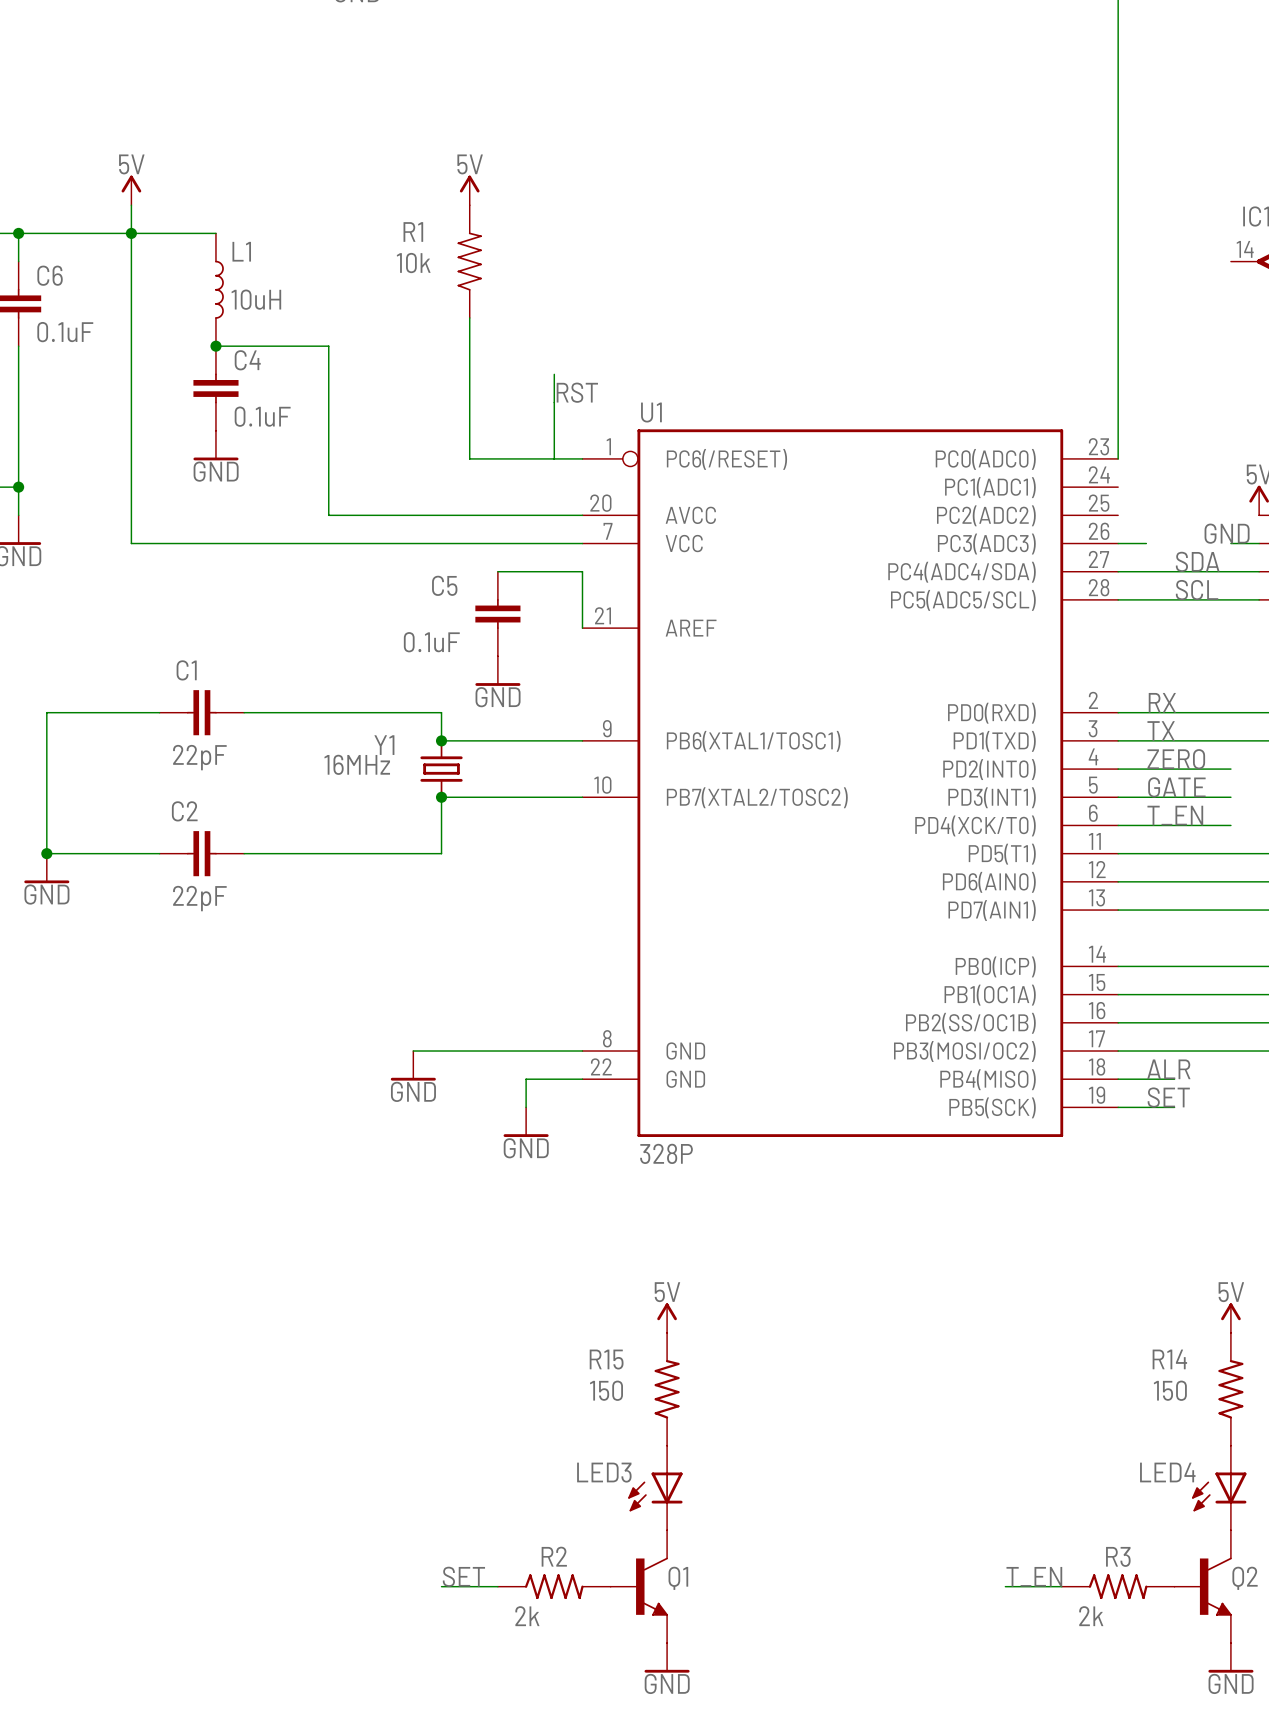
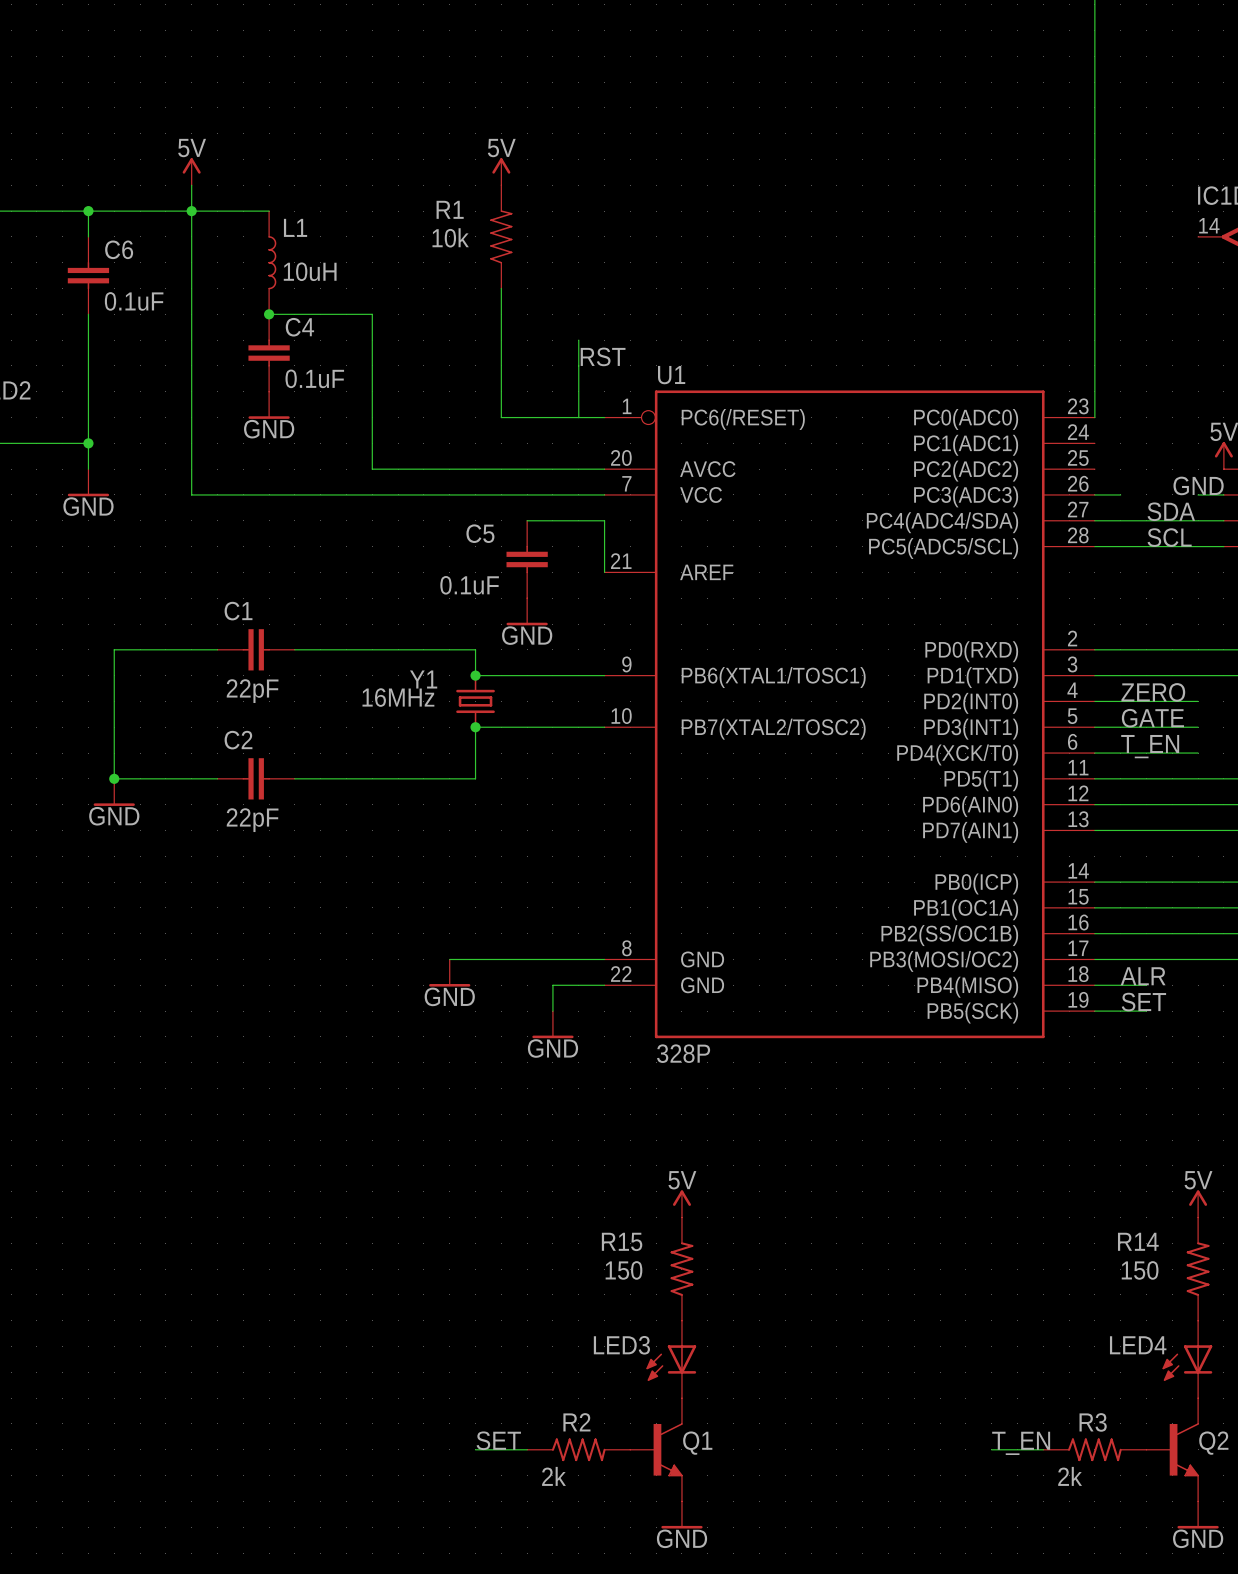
label: RX (1162, 702) -> none
label: TX (1161, 731) -> none

